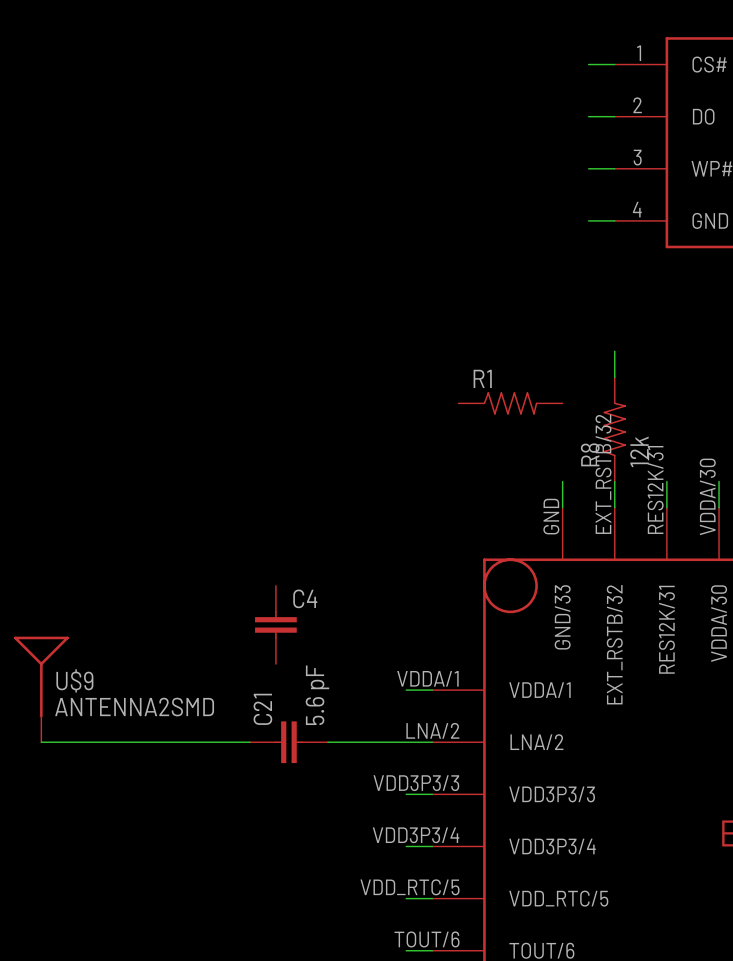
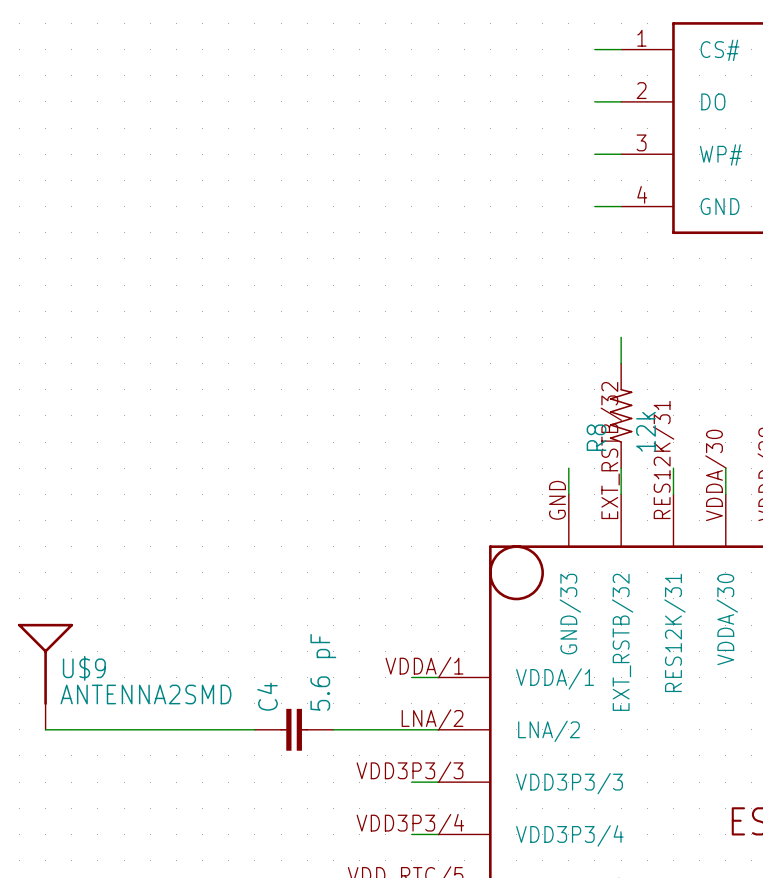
R1: (510, 403) -> none
C4: (275, 624) -> none
C21 name: C21 (262, 709) -> C4 (267, 696)

